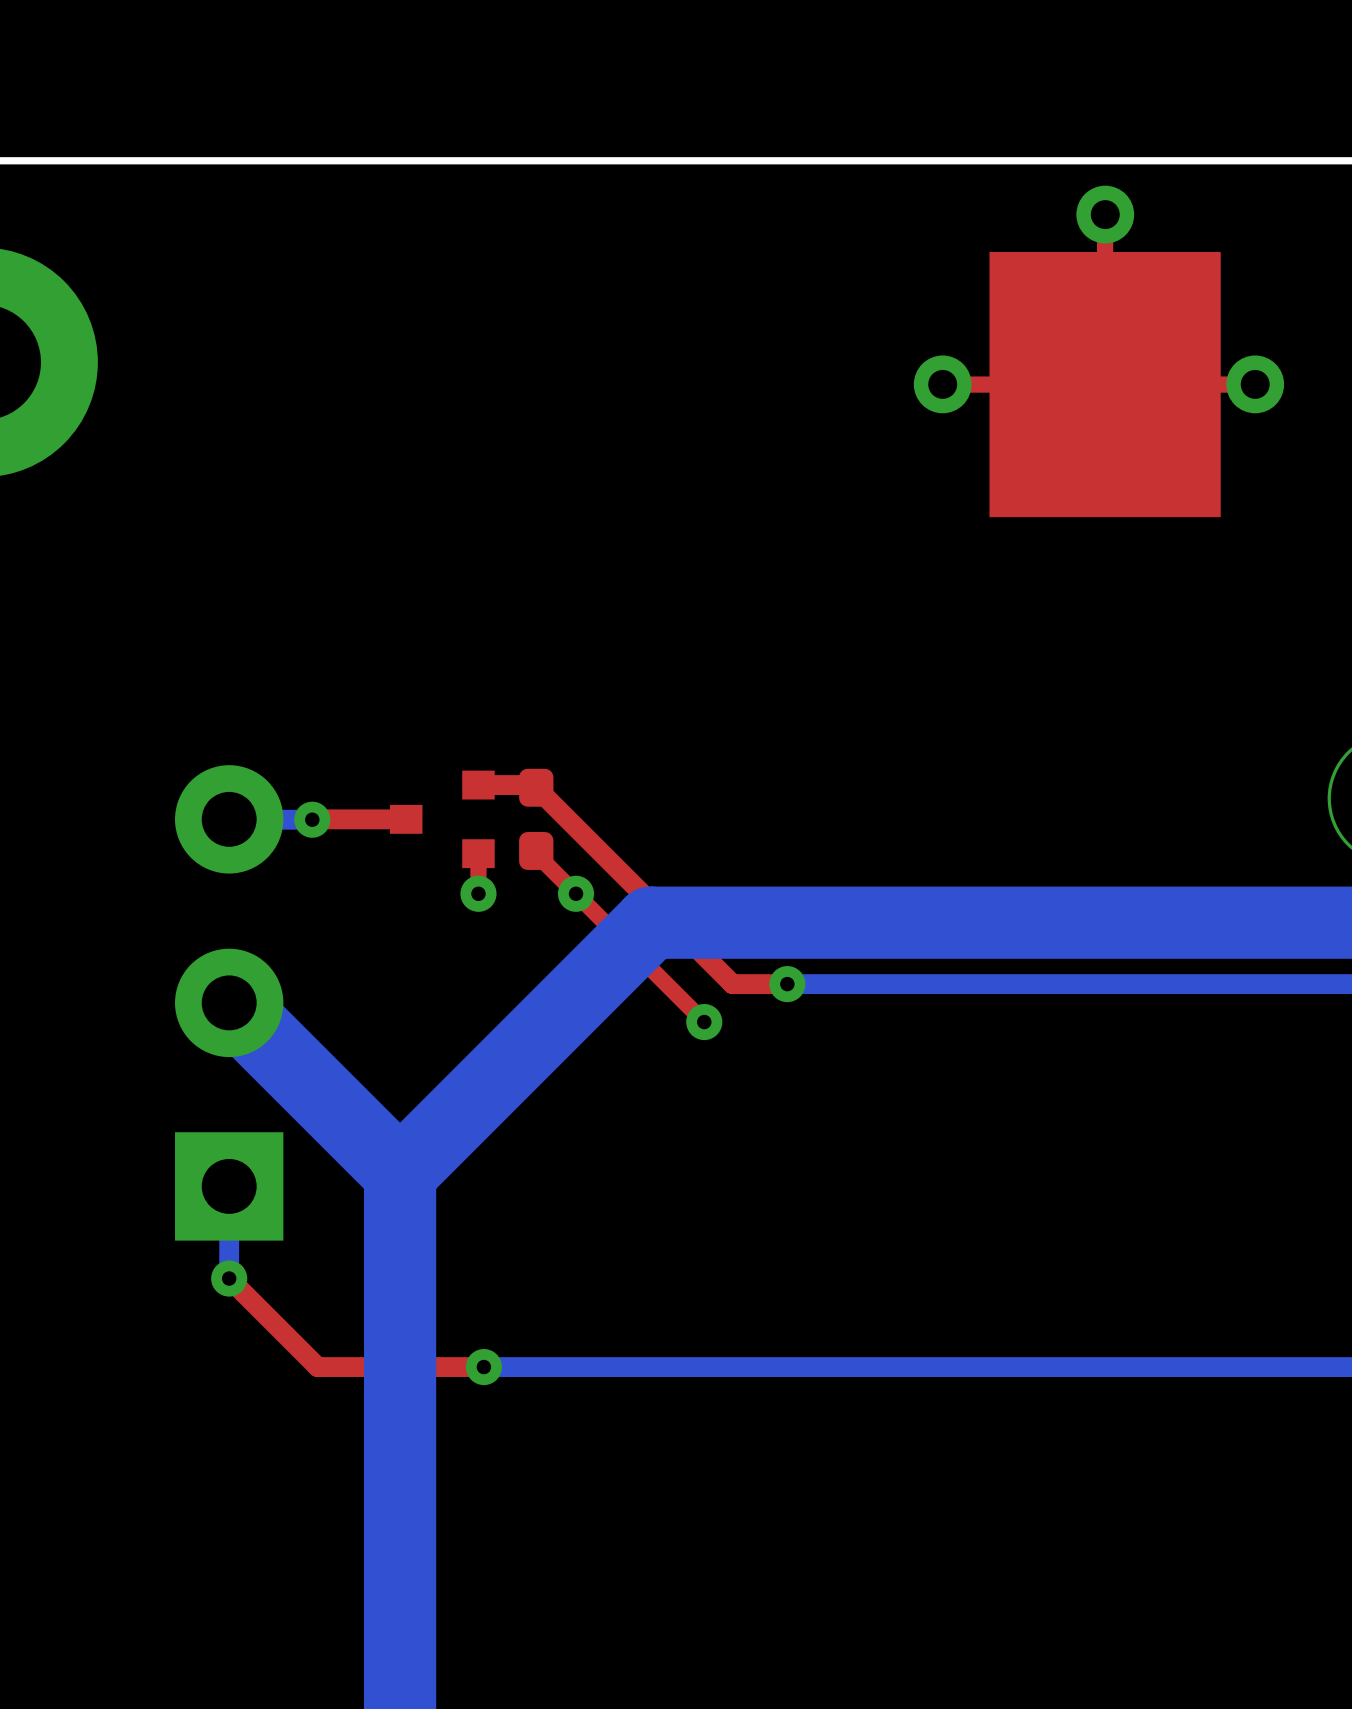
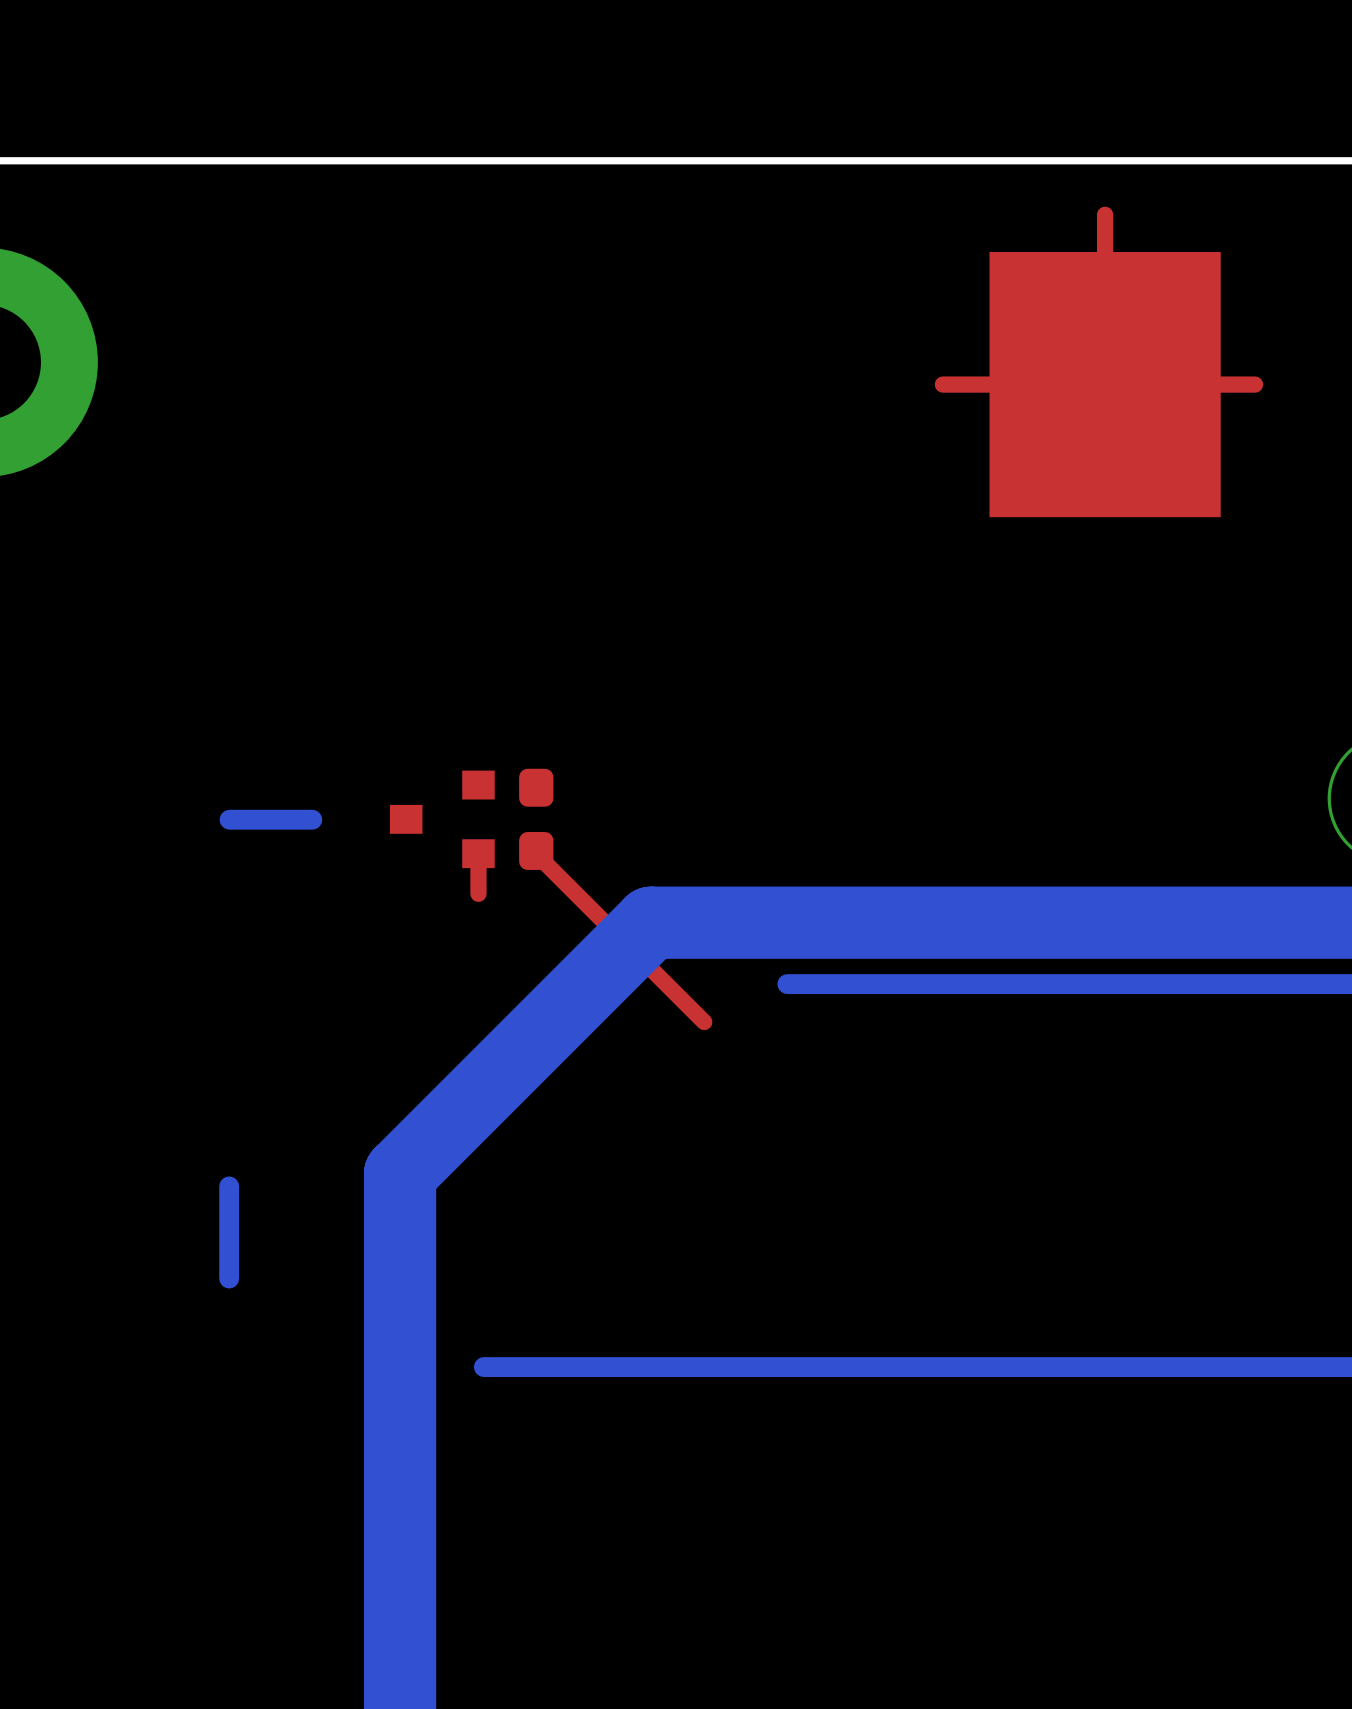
via: (1105, 214) -> none
via: (942, 384) -> none
via: (1255, 384) -> none
top track: (478, 785) (533, 785) (732, 984) (787, 984) -> none
via: (312, 819) -> none
top track: (406, 819) (312, 819) -> none
via: (478, 893) -> none
via: (576, 893) -> none
via: (787, 984) -> none
bottom track: (229, 1002) (400, 1173) -> none
part: (229, 1002) -> none
via: (704, 1022) -> none
top track: (229, 1278) (317, 1367) (483, 1367) -> none
via: (229, 1278) -> none
via: (483, 1367) -> none

